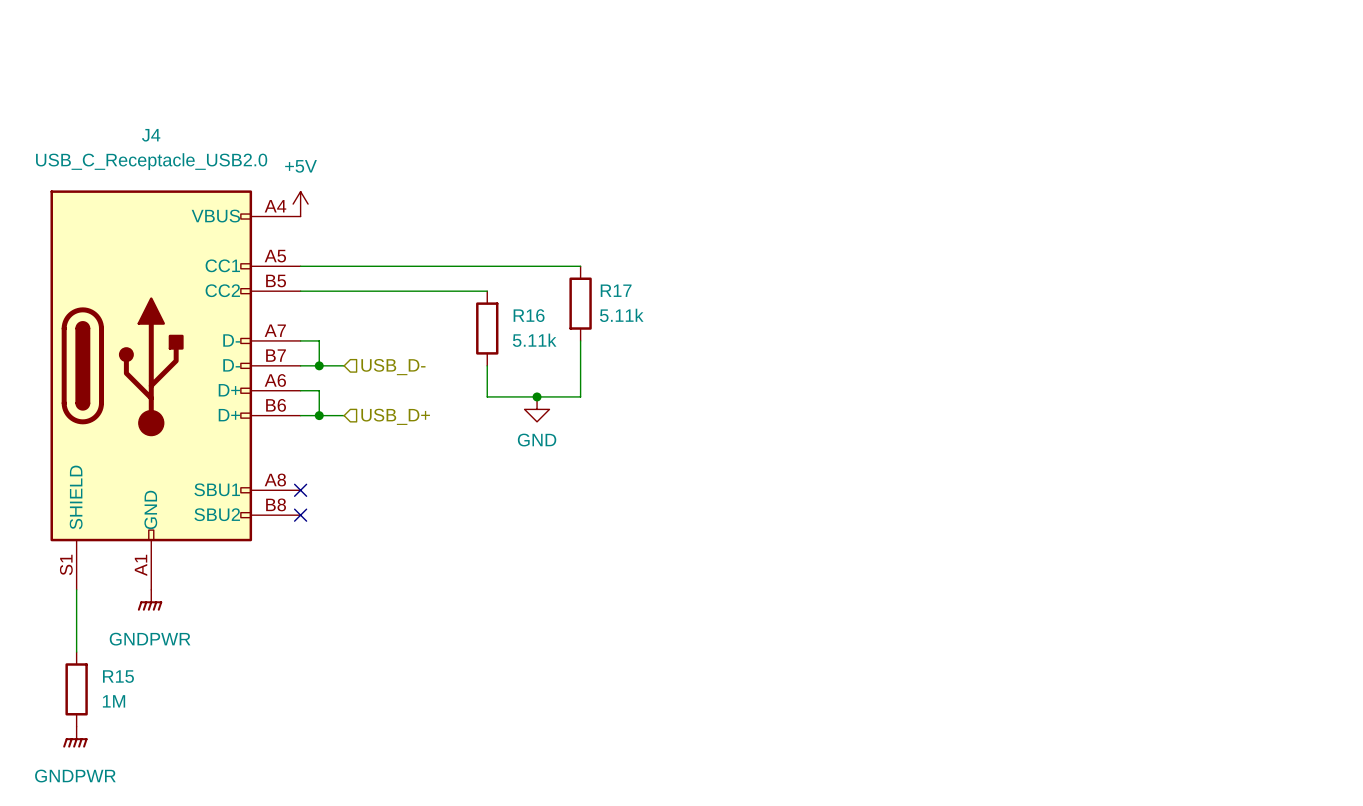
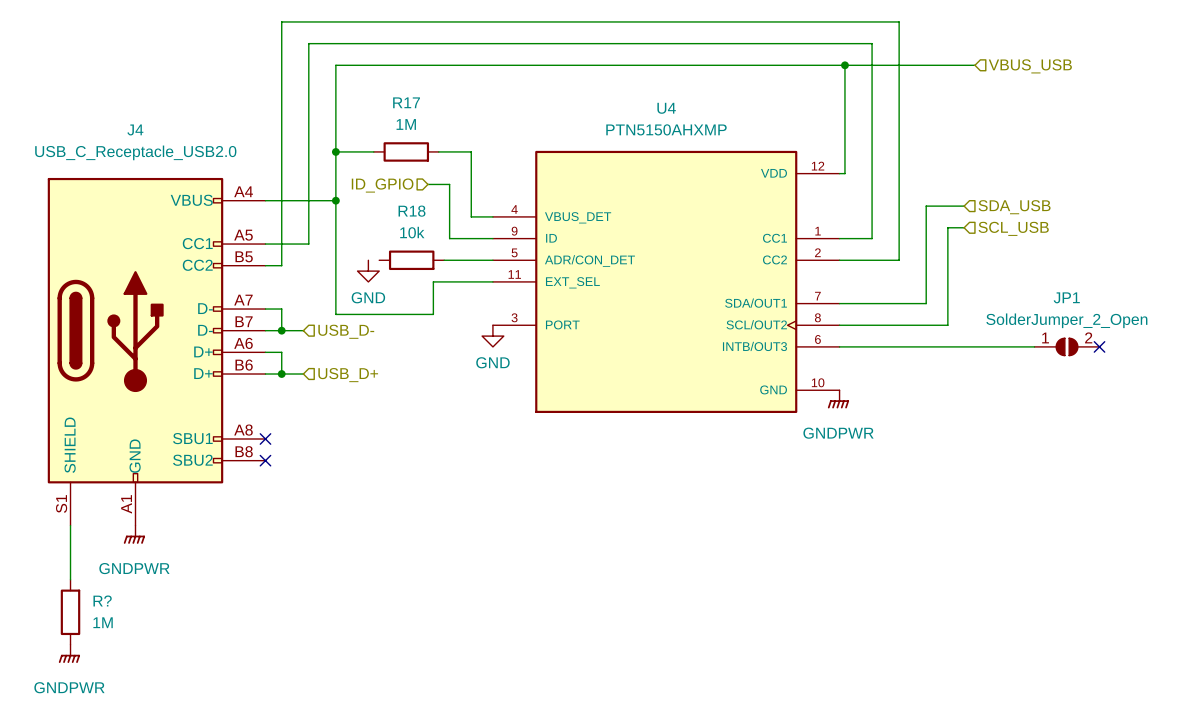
wire: none -> (844, 65) (844, 173) (839, 173)
junction: none -> (844, 65)
wire: none -> (974, 65) (335, 65) (335, 314) (433, 314) (433, 281) (492, 281)
hierarchical label: none -> VBUS_USB (1030, 66)
wire: none -> (335, 151) (373, 151)
junction: none -> (335, 151)
wire: none -> (438, 151) (471, 151) (471, 216) (492, 216)
wire: none -> (427, 184) (449, 184) (449, 238) (492, 238)
hierarchical label: none -> ID_GPIO (382, 185)
power symbol: +5V (300, 204) -> none
wire: none -> (265, 200) (335, 200)
junction: none -> (335, 200)
wire: none -> (964, 206) (926, 206) (926, 303) (839, 303)
hierarchical label: none -> SDA_USB (1014, 207)
wire: none -> (964, 227) (947, 227) (947, 325) (839, 325)
hierarchical label: none -> SCL_USB (1013, 228)
wire: (350, 266) (580, 266) -> (308, 244) (308, 43) (872, 43) (872, 238) (839, 238)
R18: none -> 10k (411, 260)
wire: none -> (444, 260) (492, 260)
R17 name position: R17 (616, 290) -> R17 (406, 102)
wire: (319, 291) (487, 291) -> (281, 265) (281, 21) (899, 21) (899, 260) (839, 260)
power symbol: none -> GND (368, 271)
R17 rotation: 0° (580, 303) -> 90° clockwise (406, 151)
R17 position: (580, 303) -> (406, 151)
U4: none -> PTN5150AHXMP (666, 281)
R17 value: 5.11k (621, 315) -> 1M (406, 124)
R16: 5.11k (487, 328) -> none
wire: (580, 340) (580, 396) (487, 396) (487, 365) -> none
wire: none -> (839, 346) (1034, 346)
JP1: none -> SolderJumper_2_Open (1067, 346)
no-connect mark: none -> (1099, 346)
junction: (537, 396) -> none
power symbol position: GND (537, 409) -> GND (492, 336)
power symbol: none -> GNDPWR (838, 399)
R15 name: R15 (118, 676) -> R? (102, 600)

